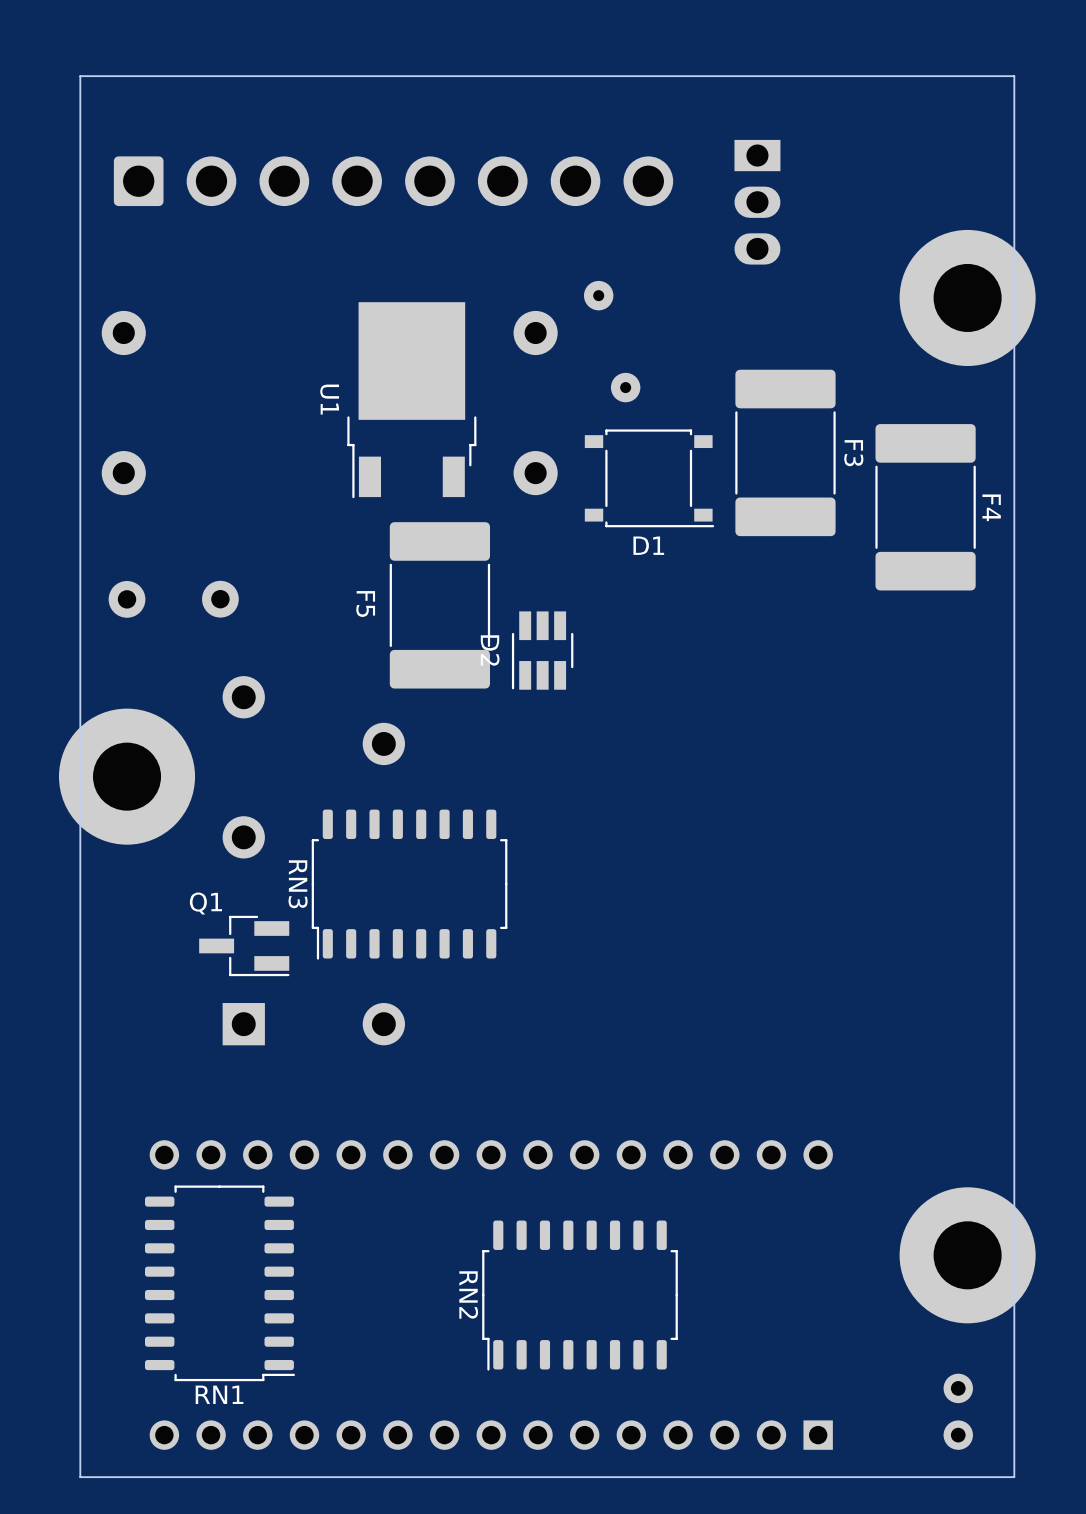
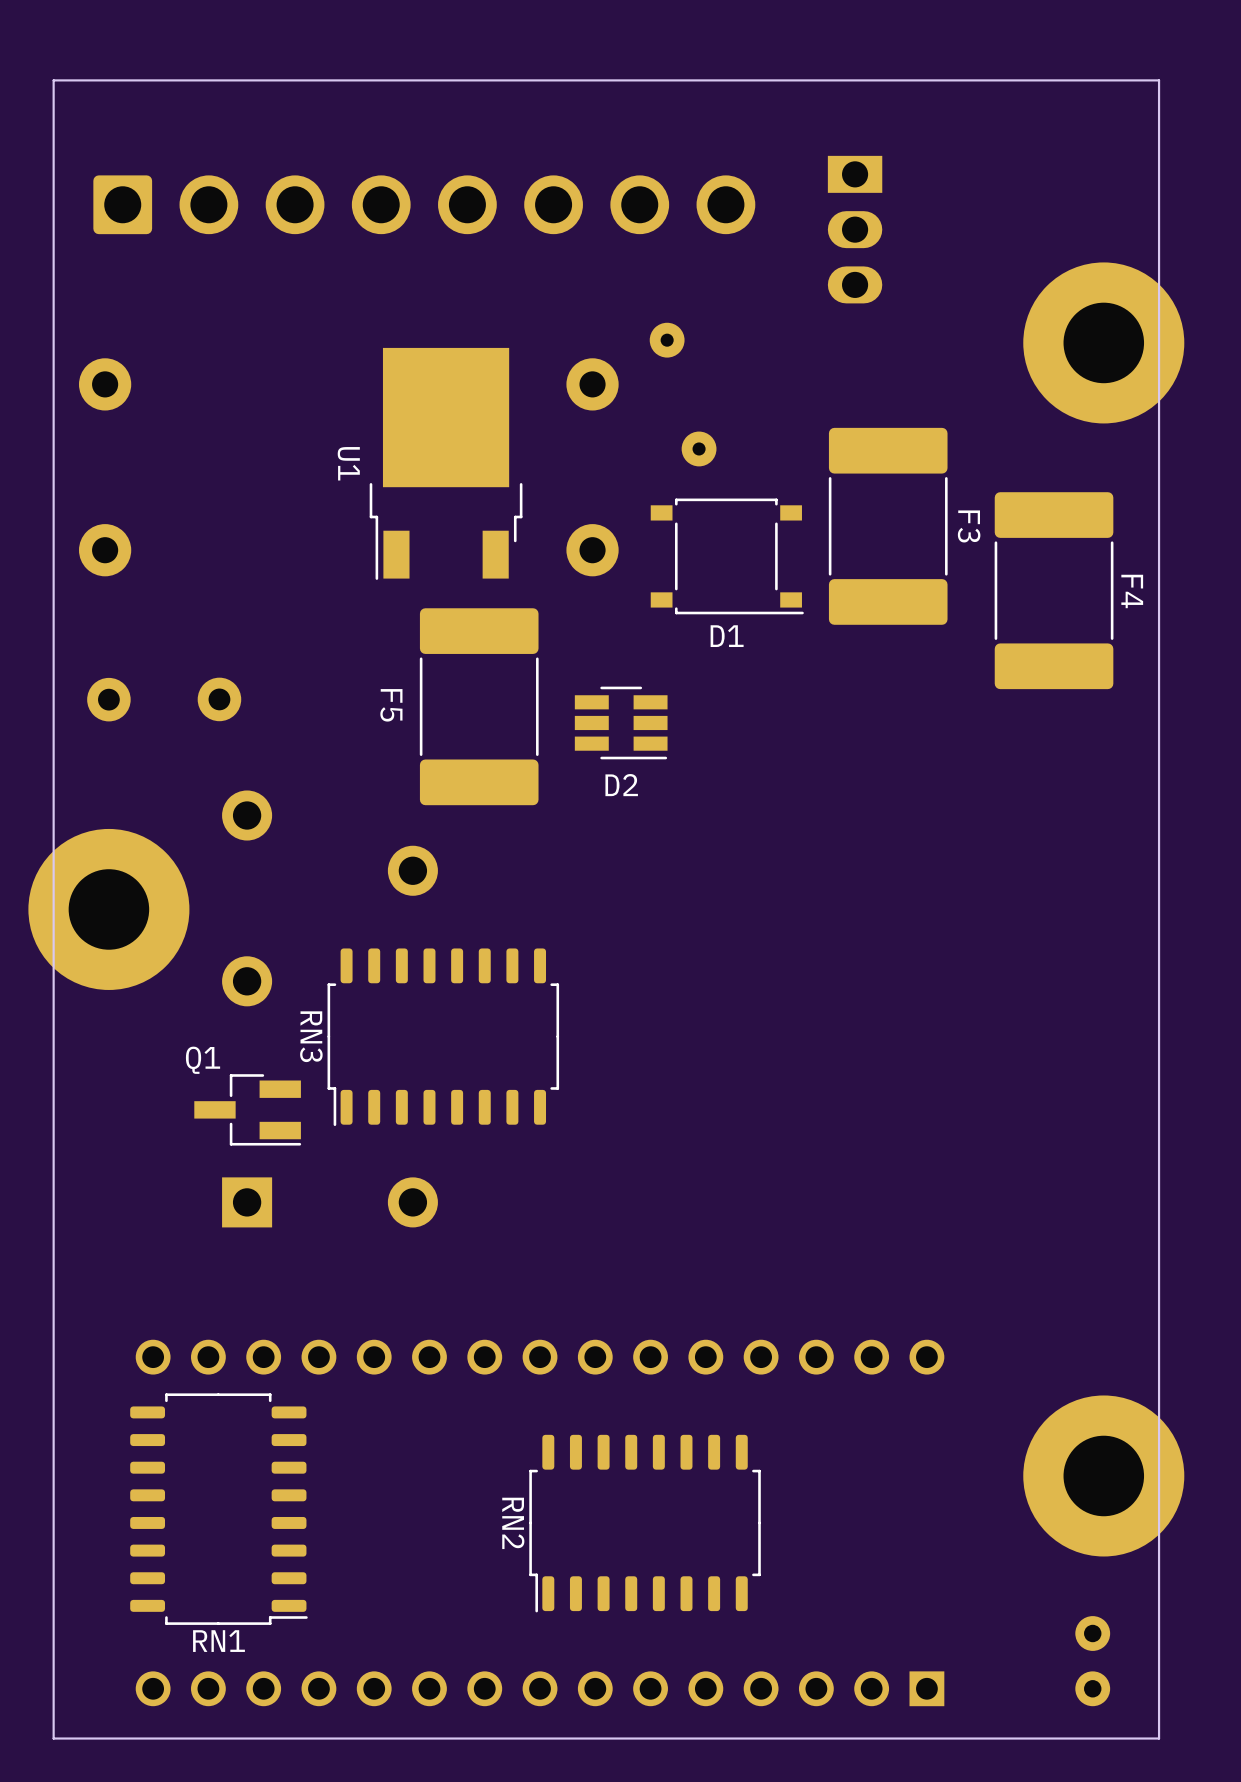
D2 rotation: 0° (542, 650) -> 90° counterclockwise (621, 722)

